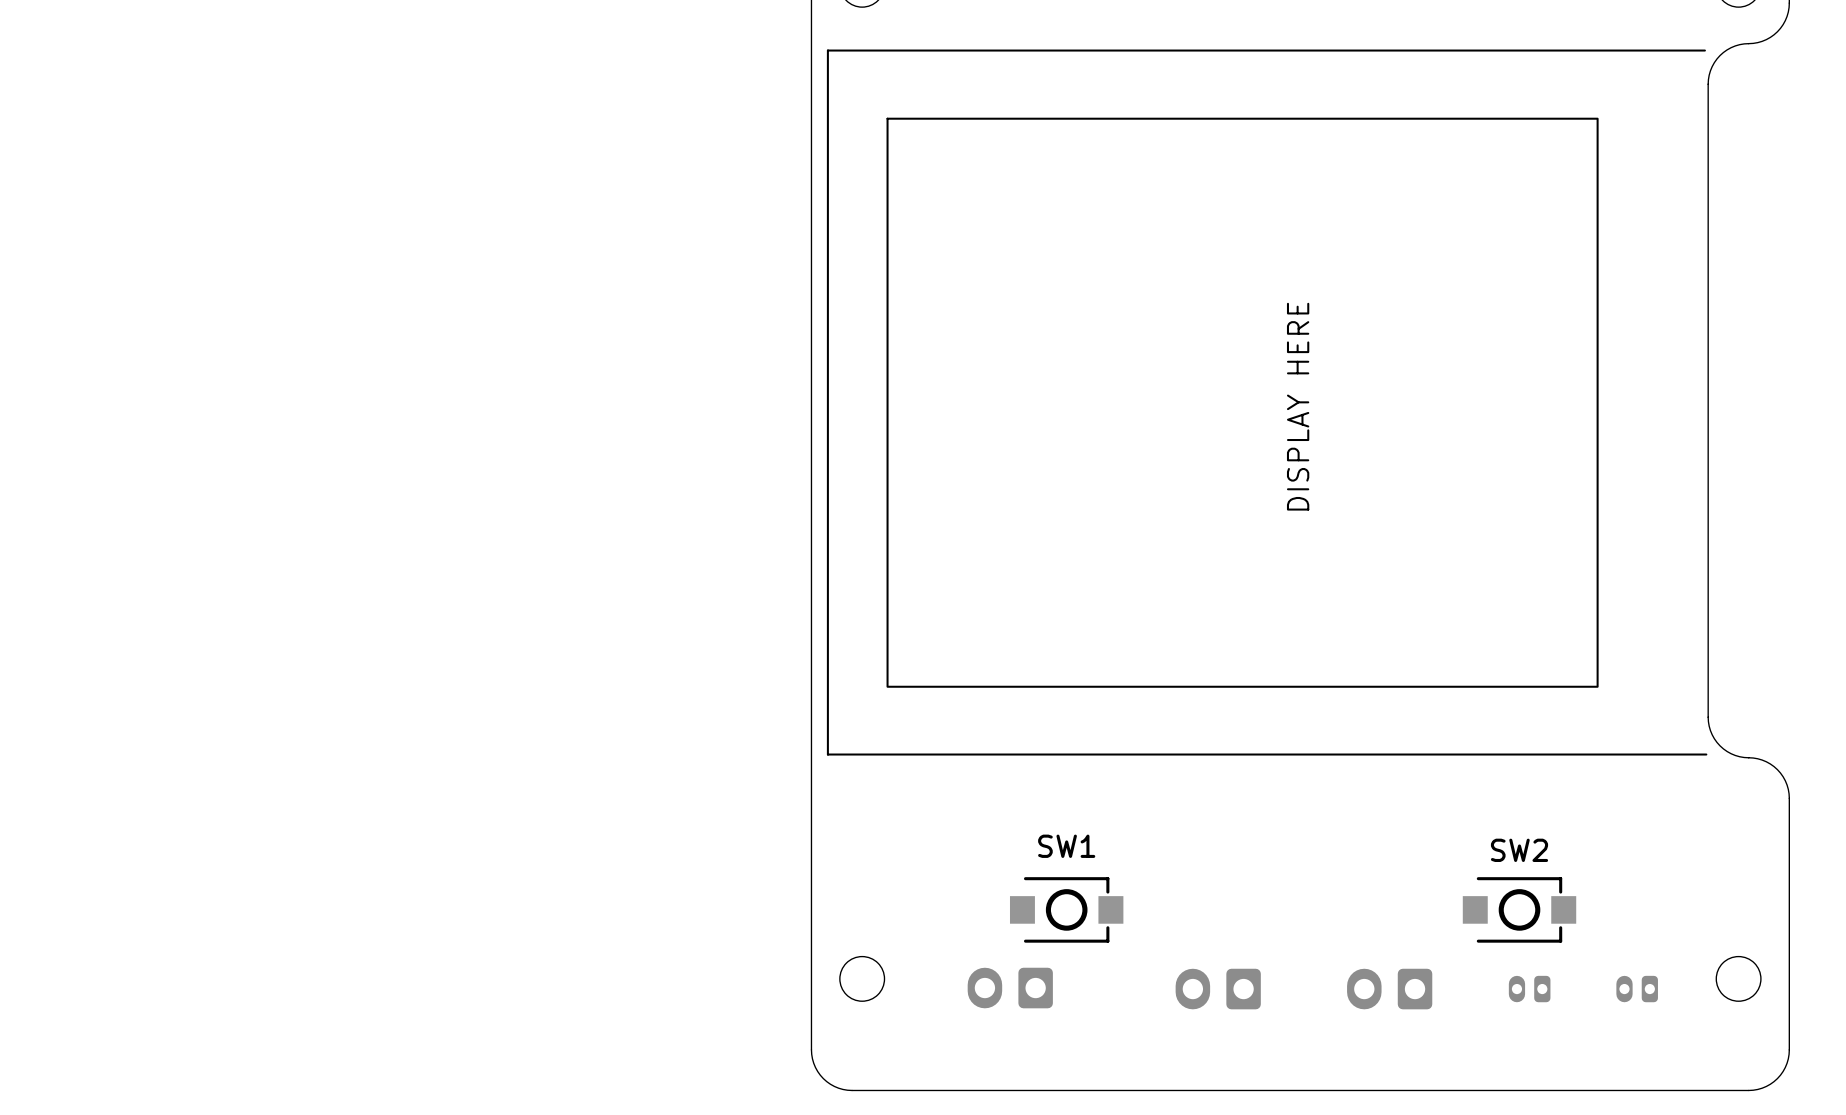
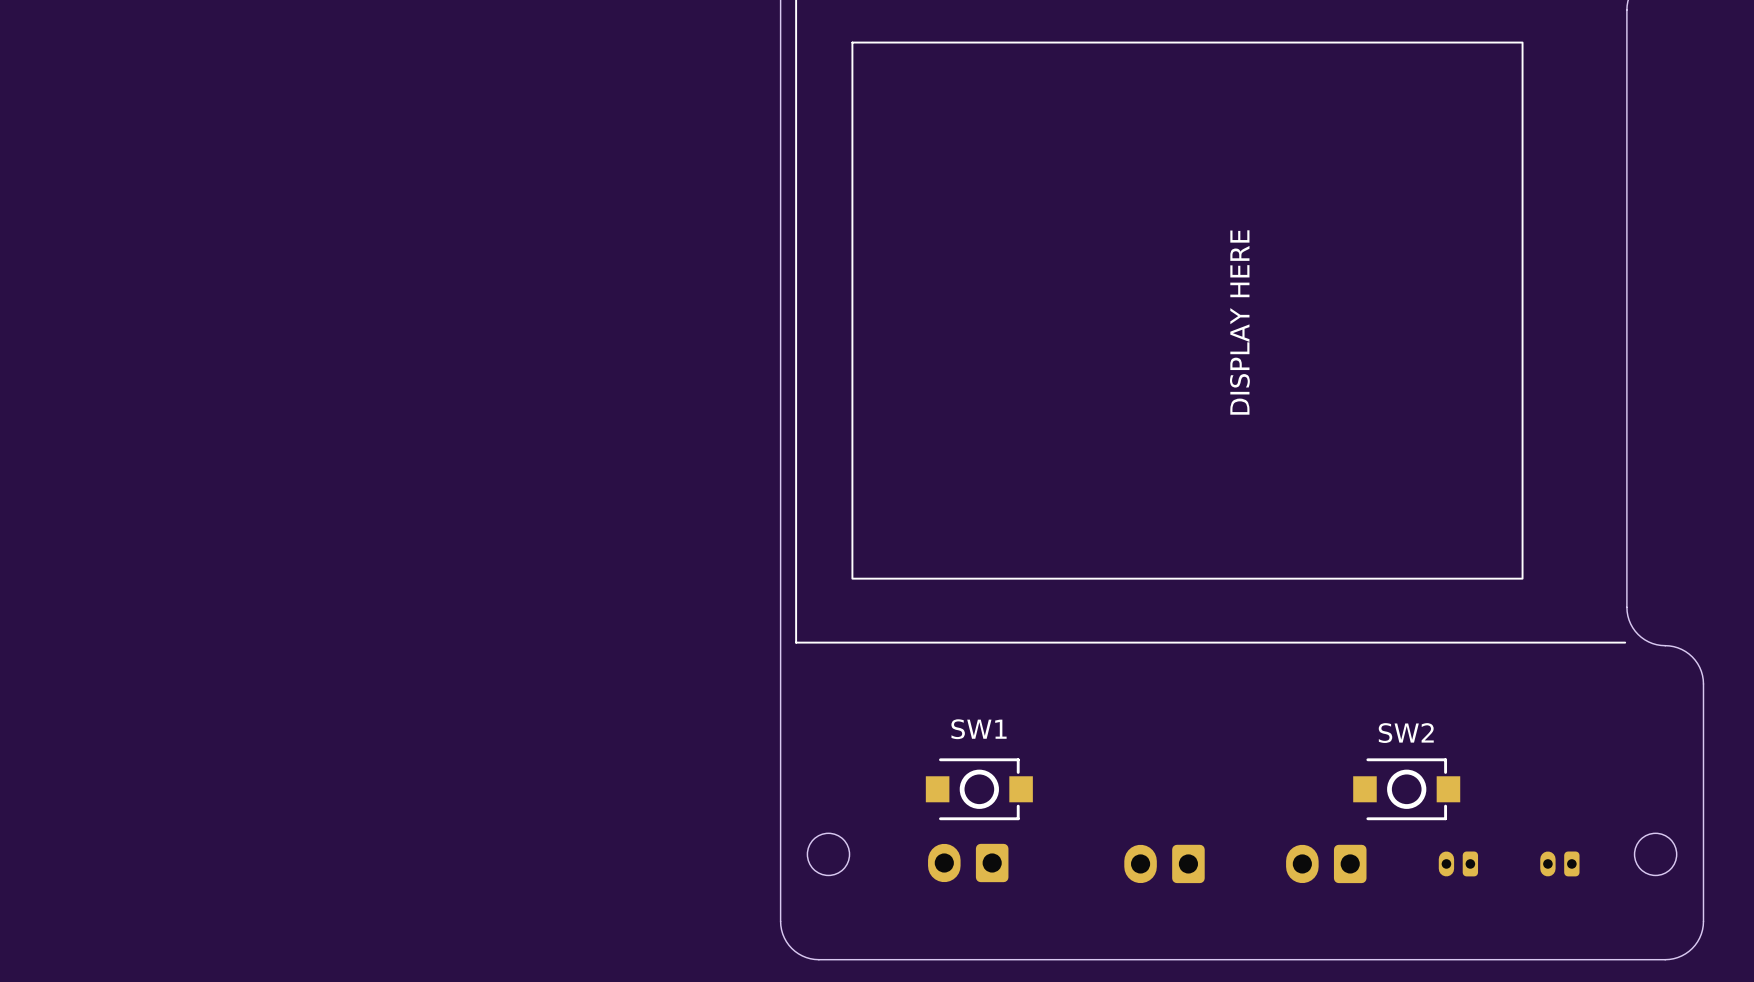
SW1 position: (1066, 909) -> (979, 789)
SW2 position: (1519, 909) -> (1406, 789)

